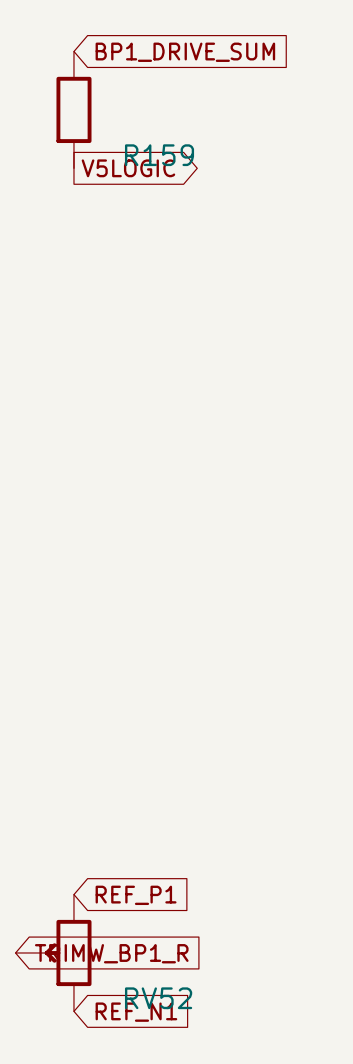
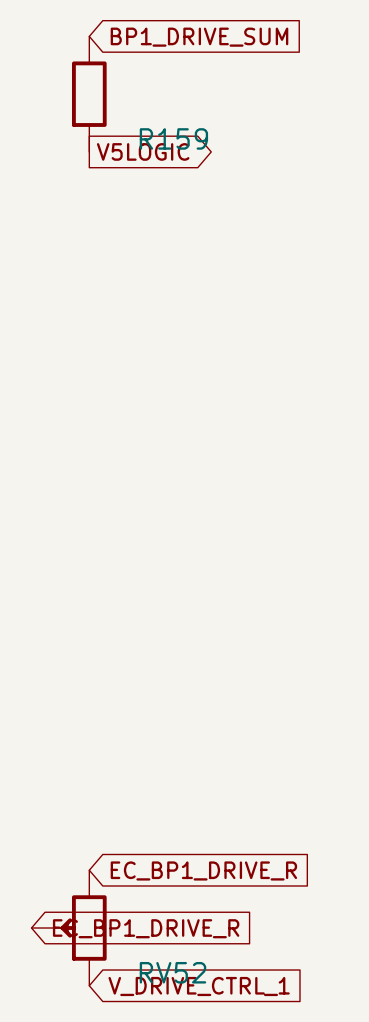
global label: REF_P1 (136, 895) -> EC_BP1_DRIVE_R (203, 870)
global label: TRIMW_BP1_R (111, 953) -> EC_BP1_DRIVE_R (146, 928)
global label: REF_N1 (136, 1012) -> V_DRIVE_CTRL_1 (199, 986)

